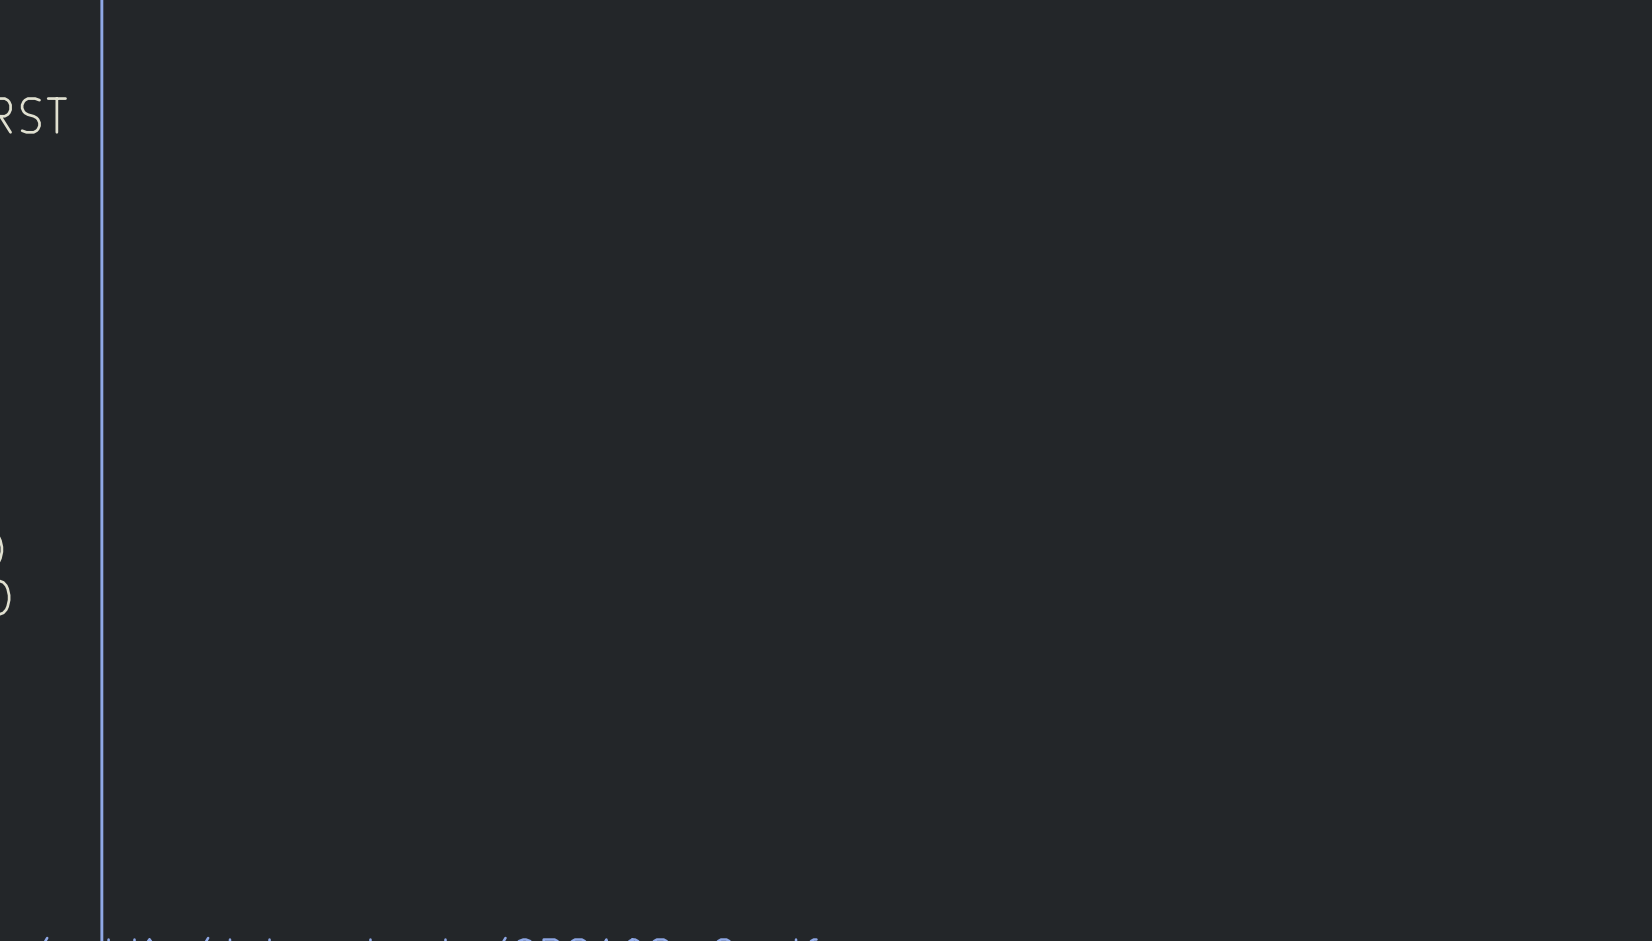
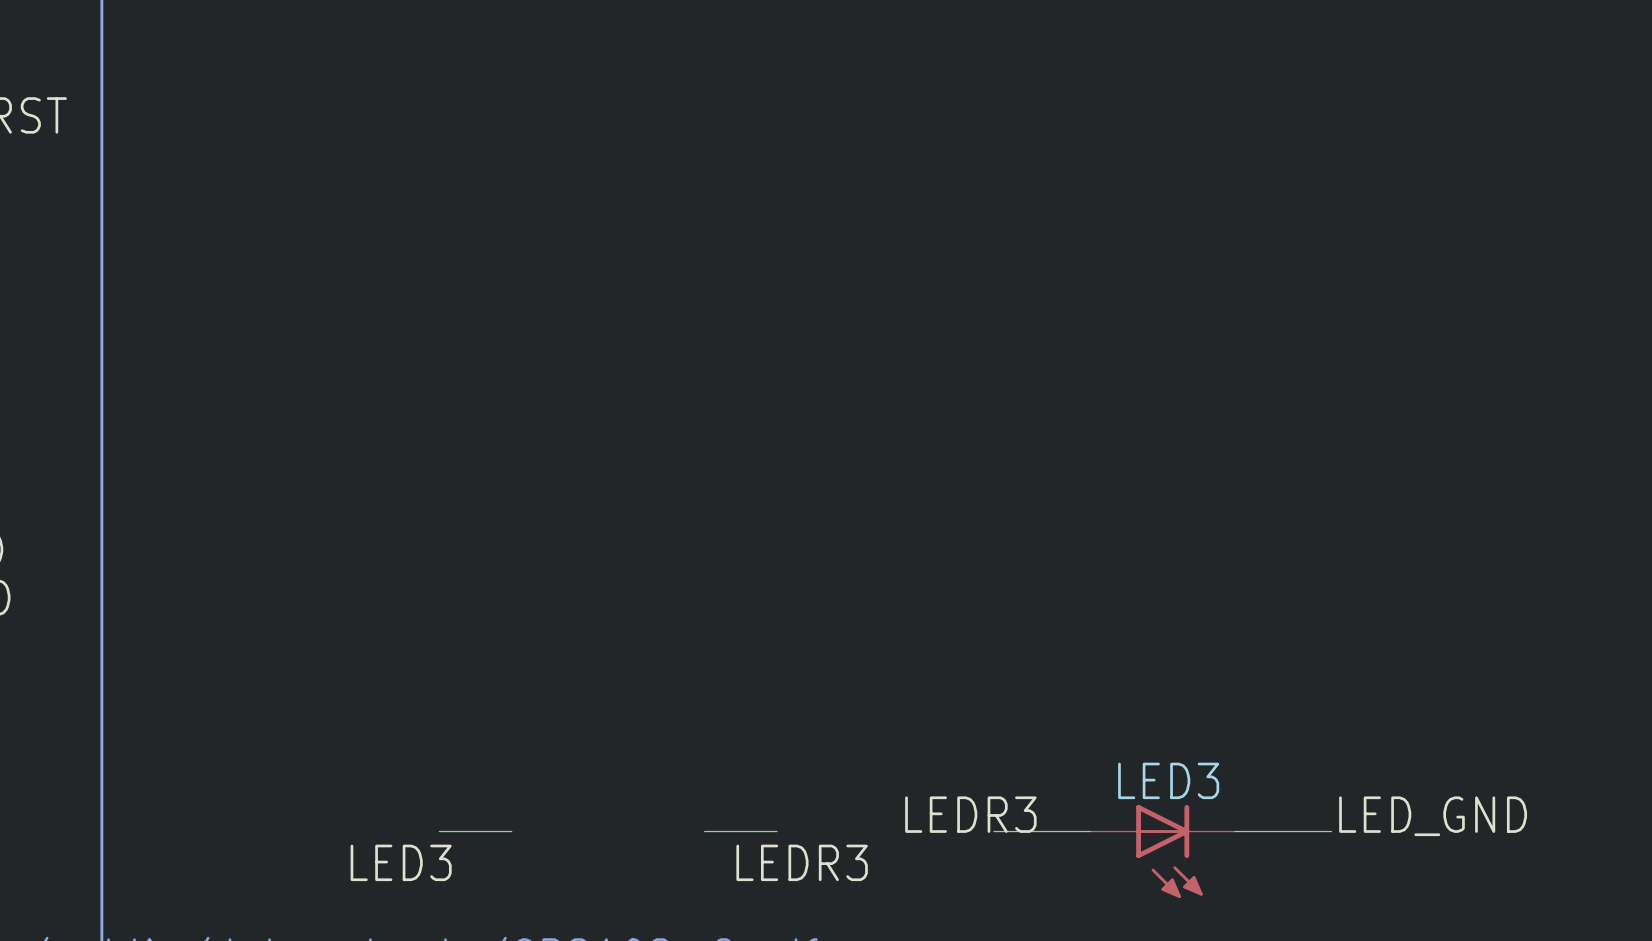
label: none -> LEDR3 (970, 814)
label: none -> LED_GND (1433, 816)
wire: none -> (439, 831) (511, 831)
wire: none -> (704, 831) (776, 831)
wire: none -> (993, 831) (1090, 831)
wire: none -> (1235, 831) (1331, 831)
LED3: none -> (1162, 851)
label: none -> LED3 (401, 862)
label: none -> LEDR3 (802, 862)

